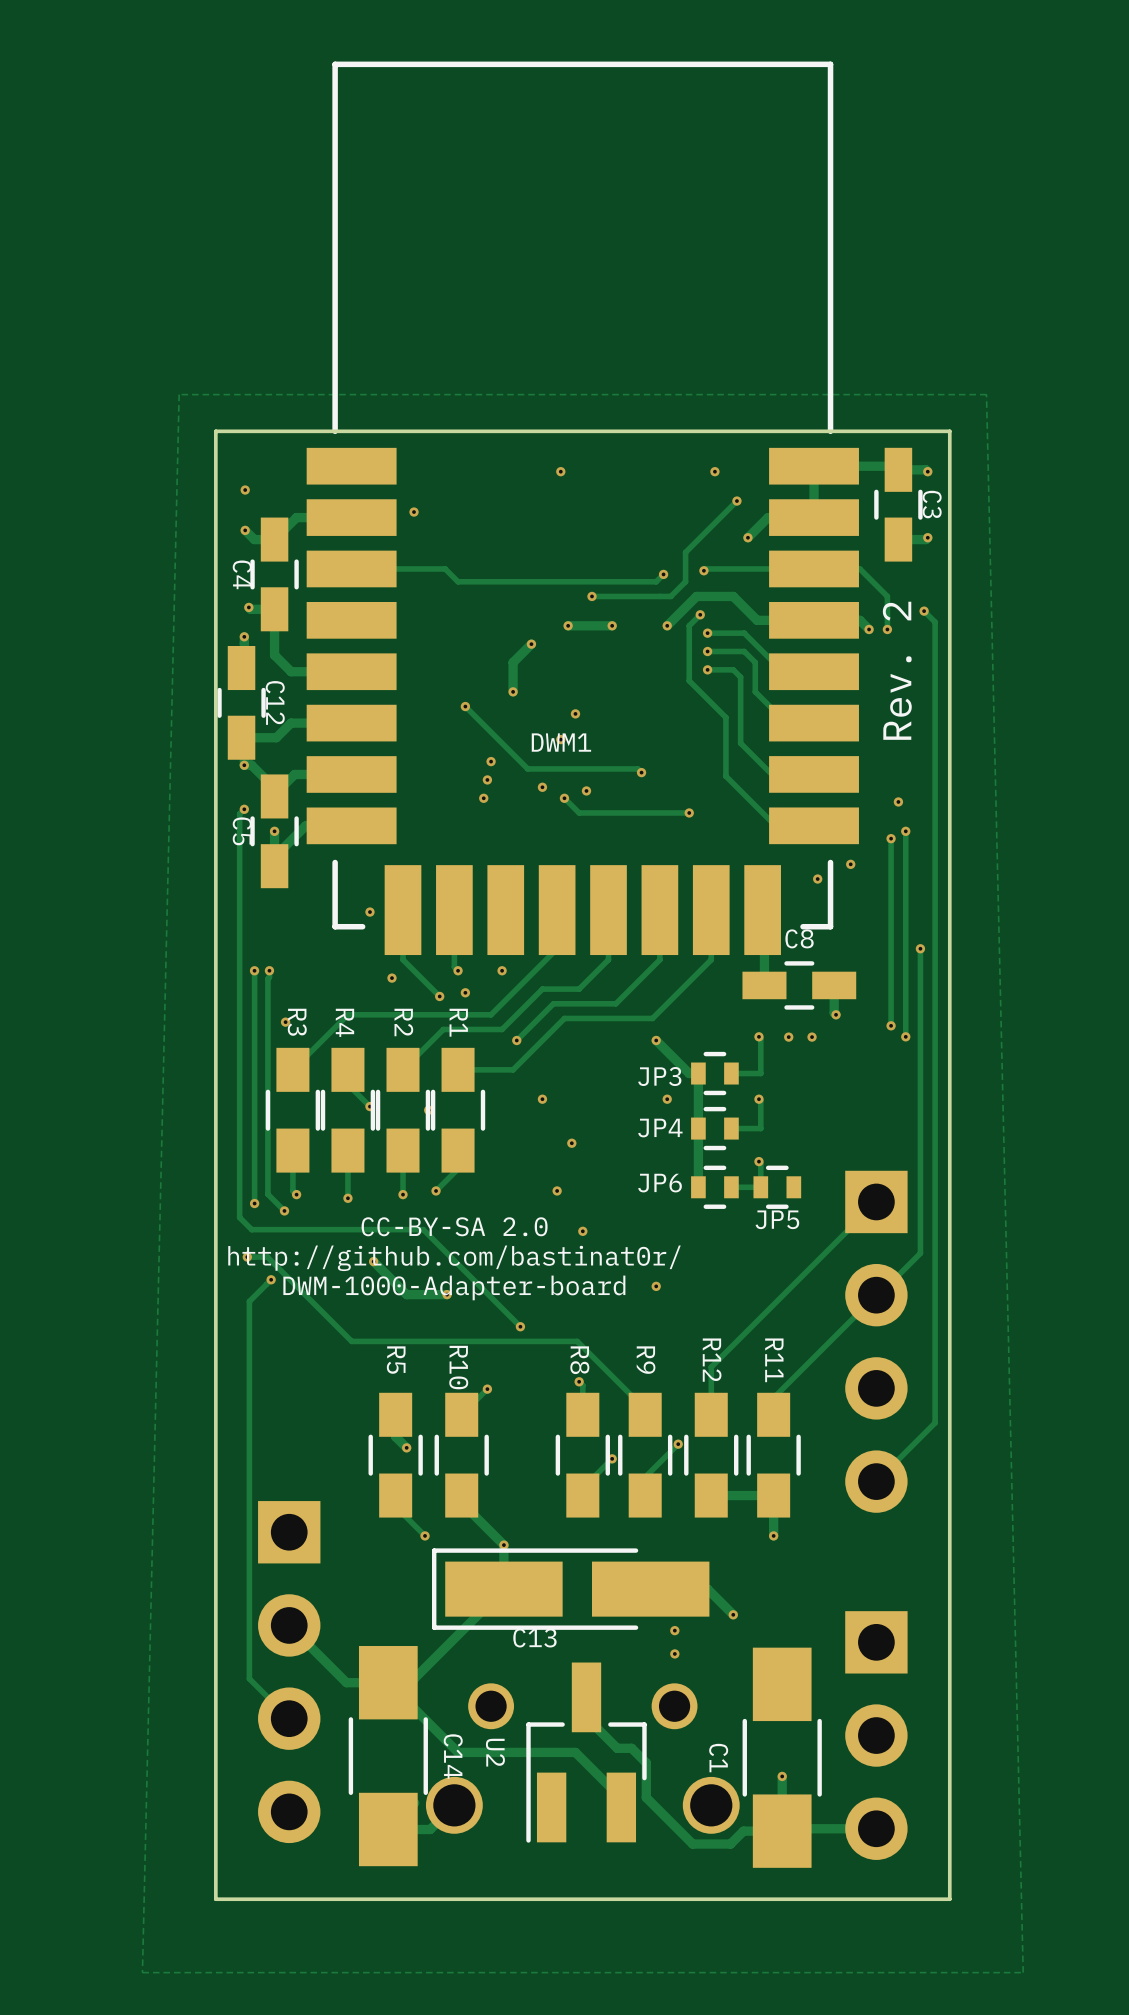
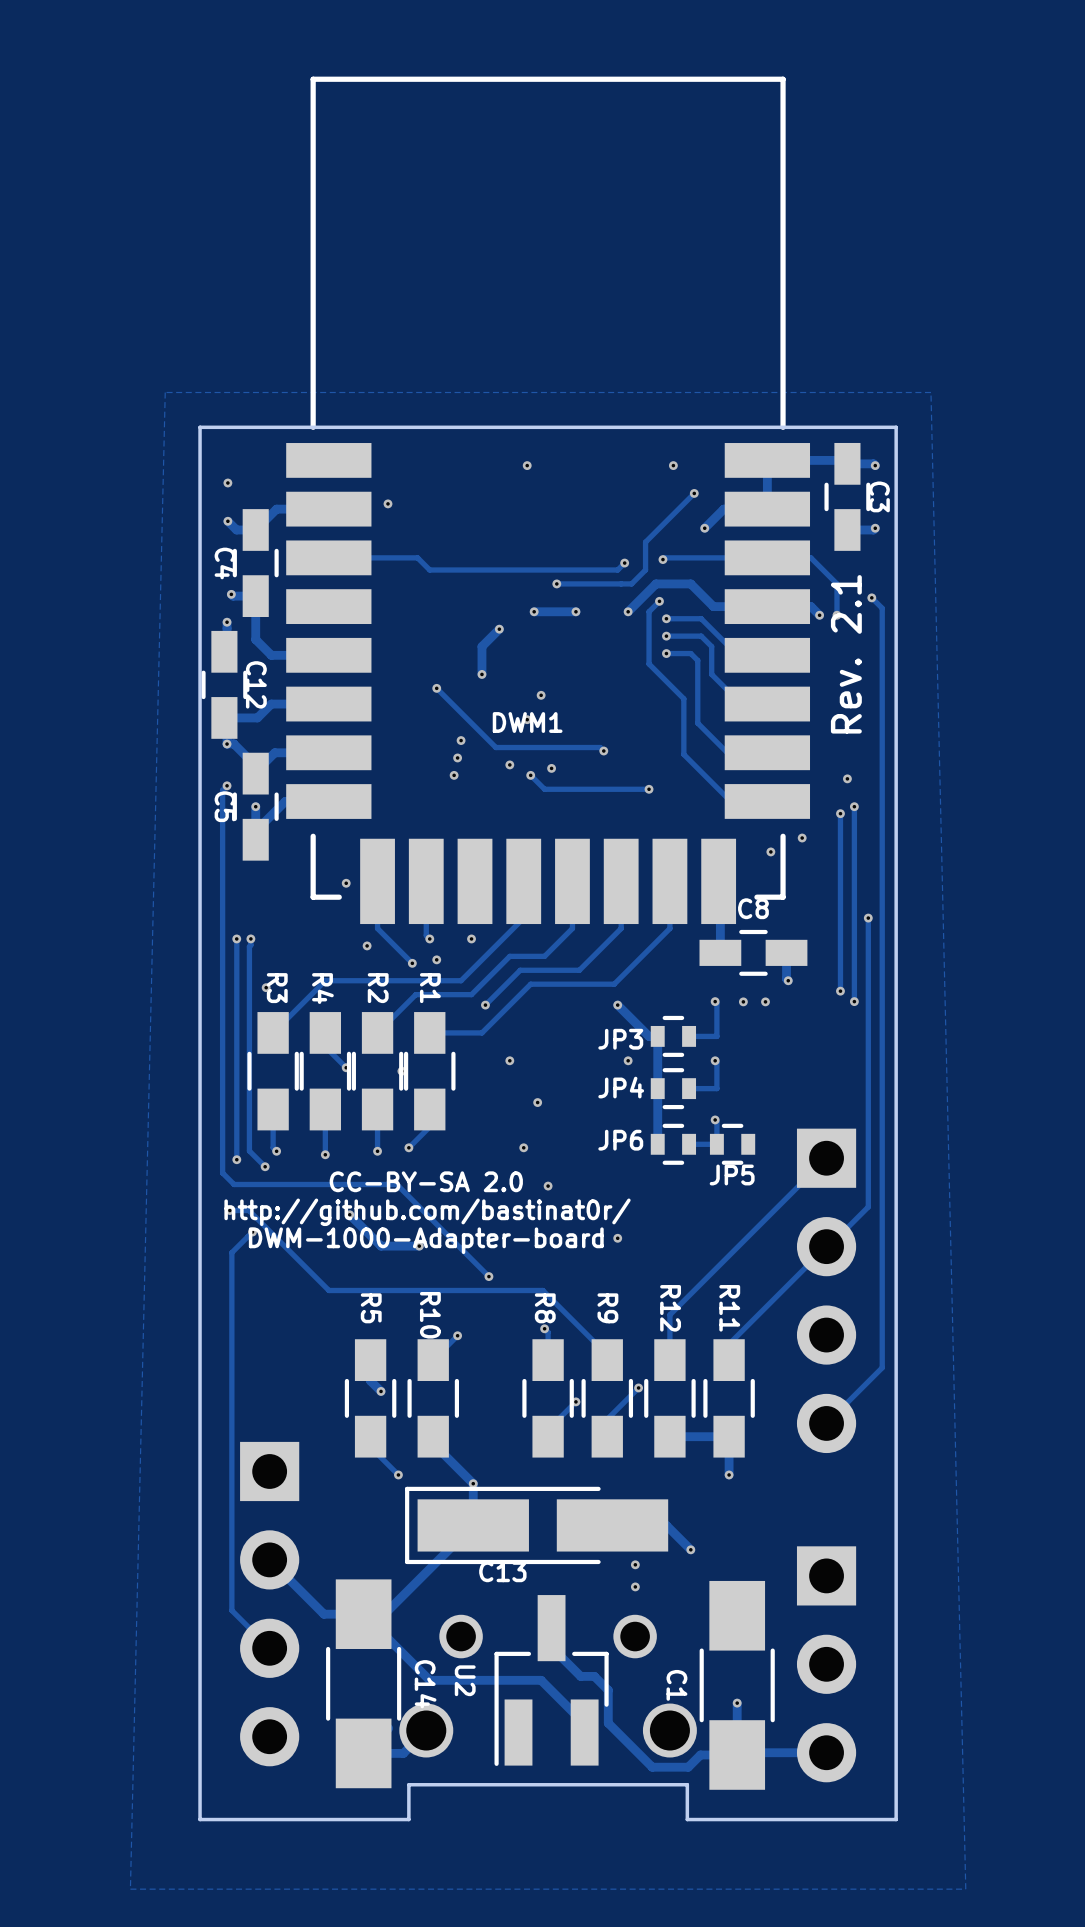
text: Rev. 2 (897, 670) -> Rev. 2.1 (846, 654)
board edge: (729, 1899) (436, 1899) -> (687, 1819) (687, 1784) (408, 1784) (408, 1819)

